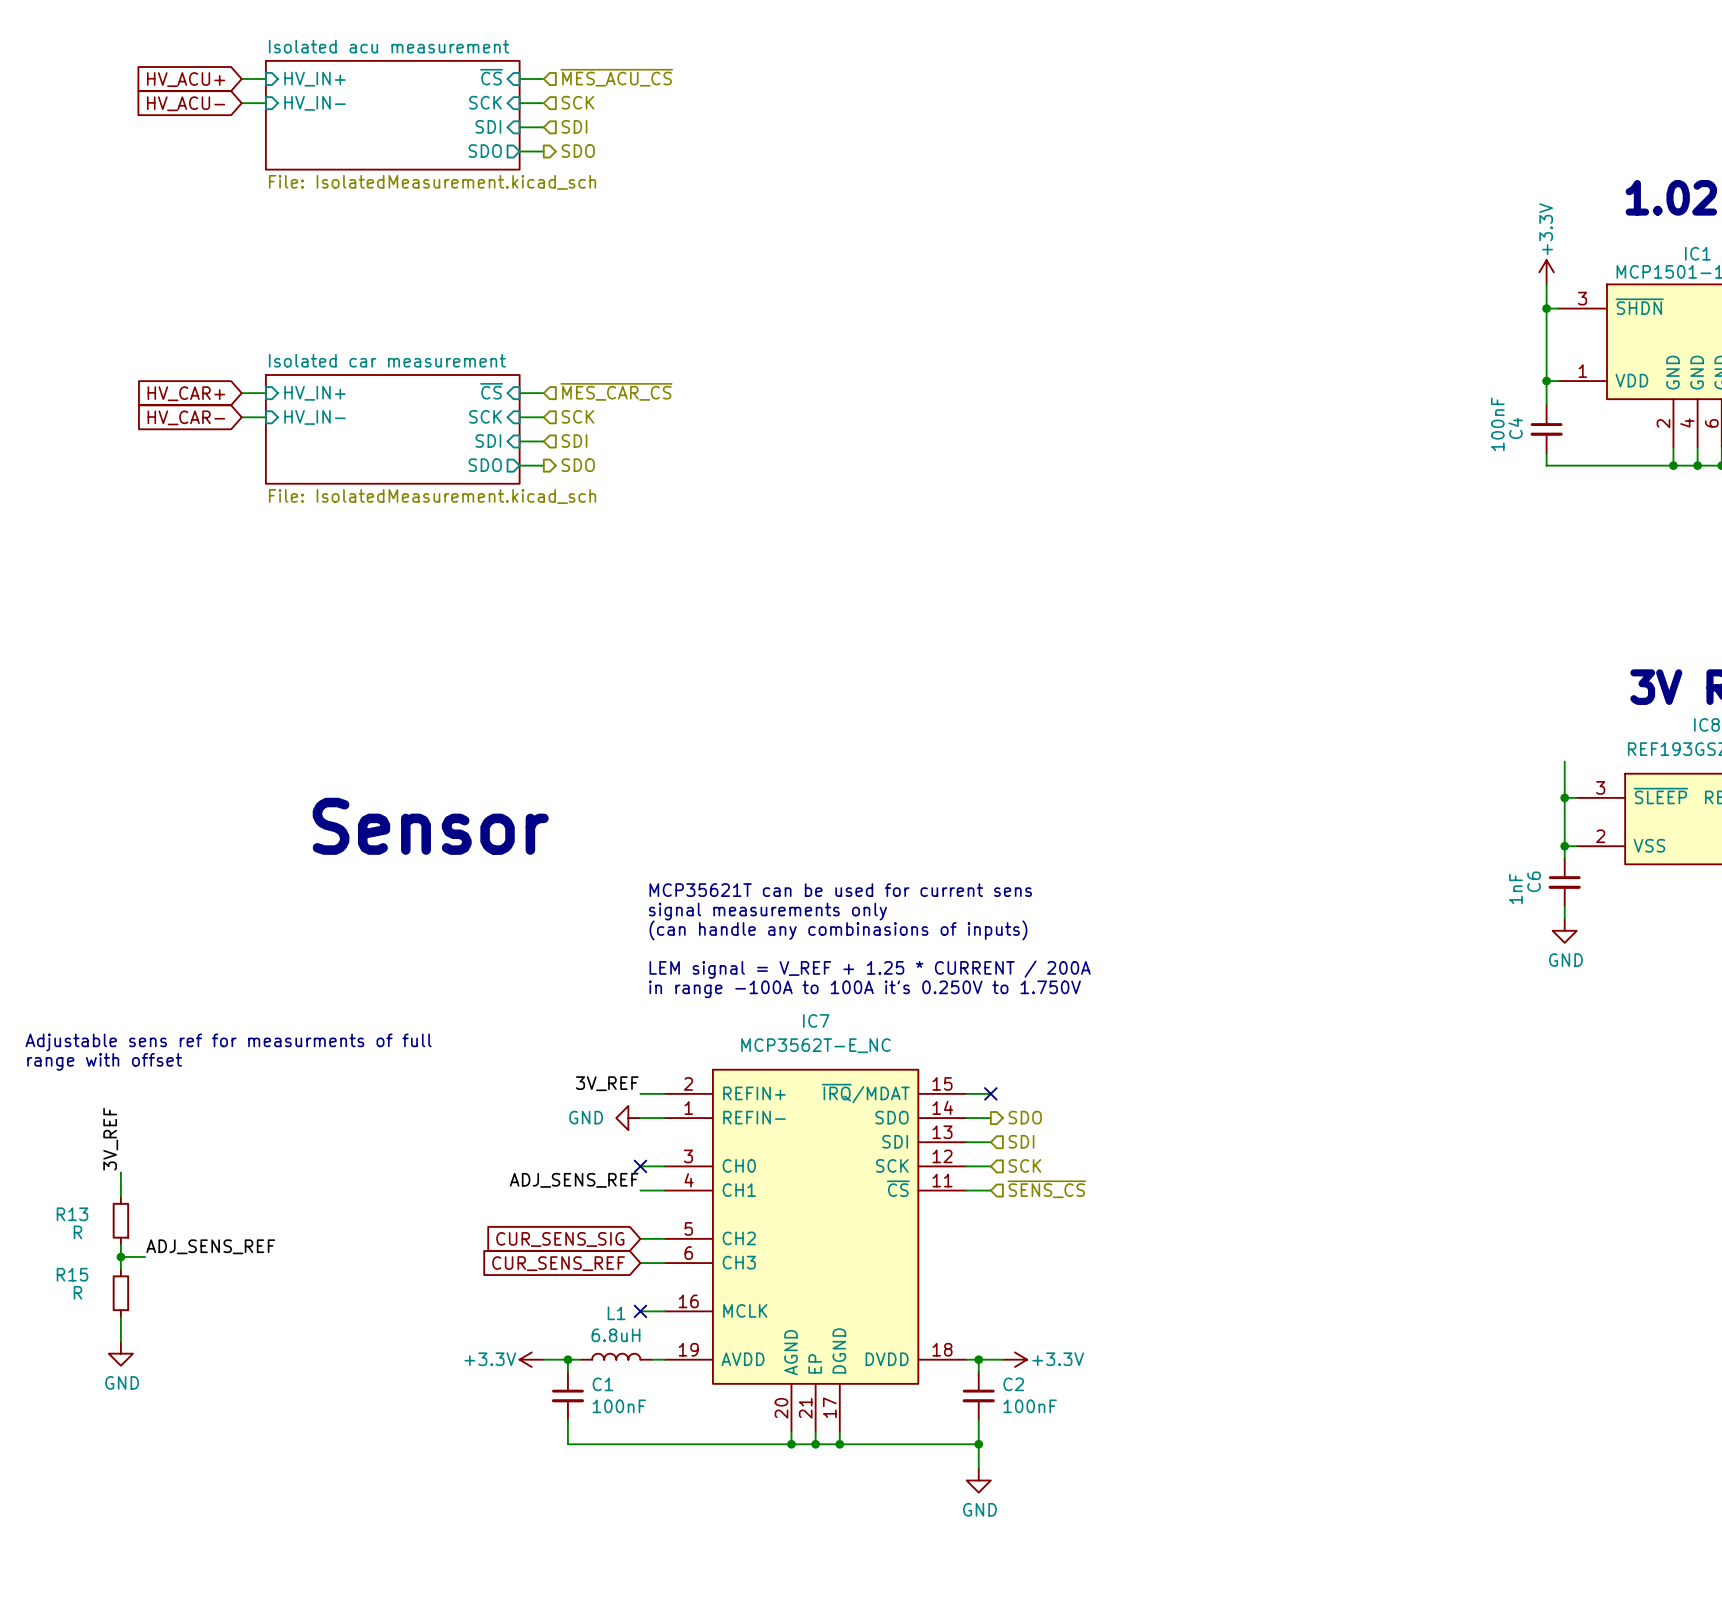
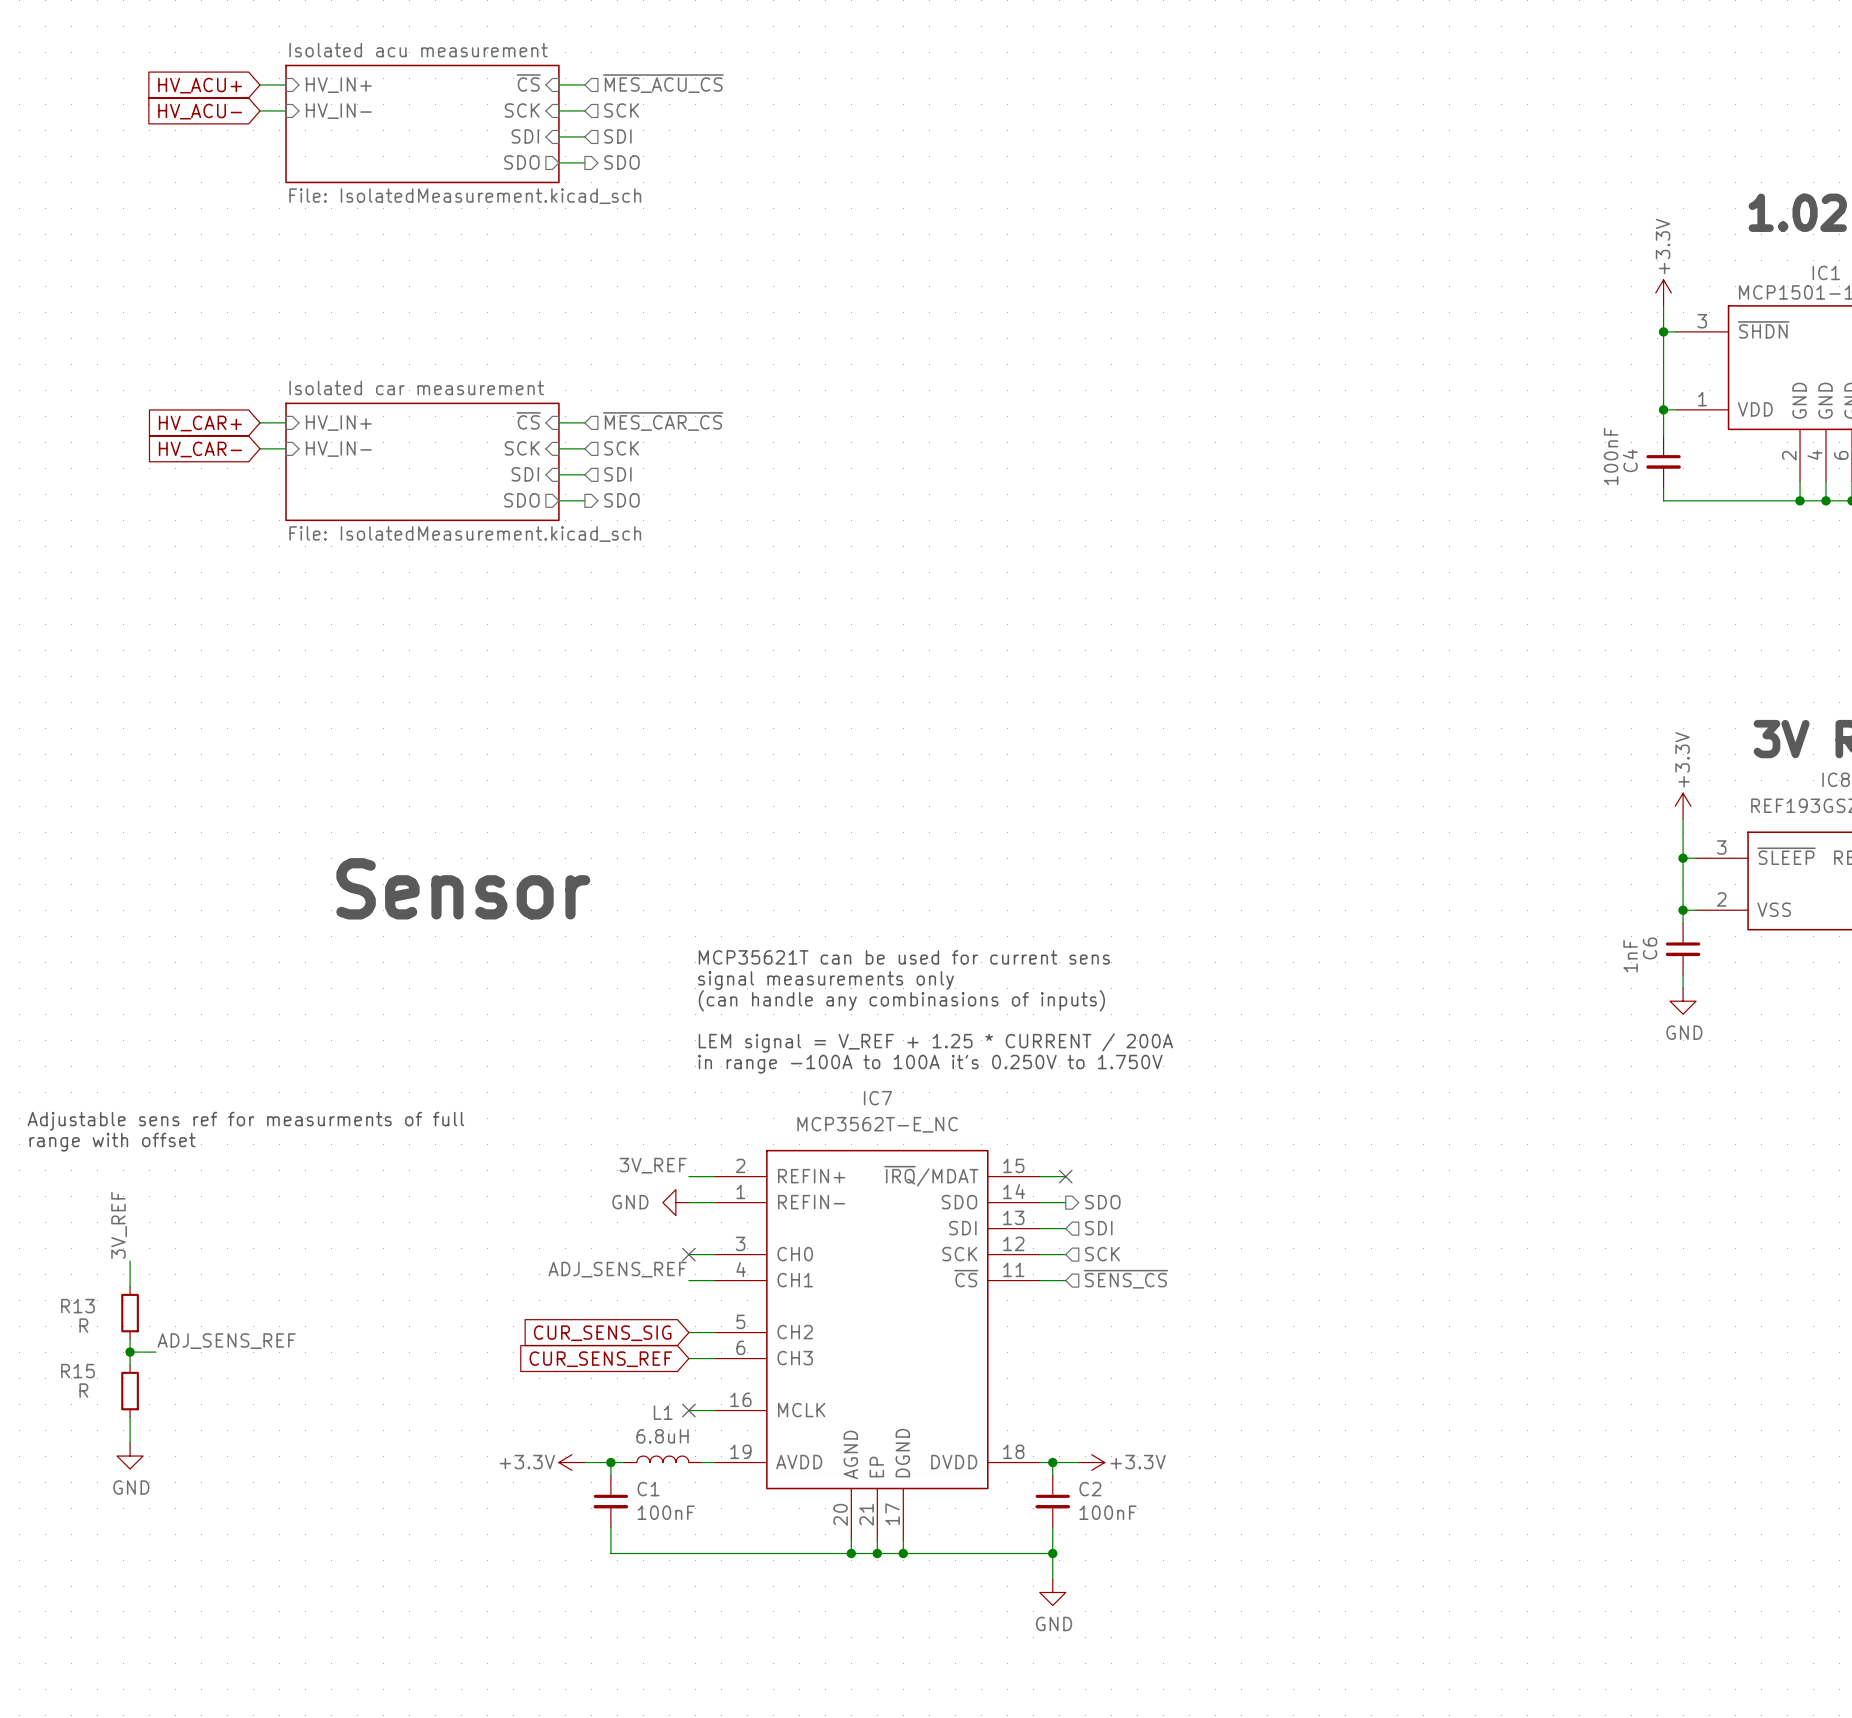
power symbol: none -> +3.3V (1683, 806)

